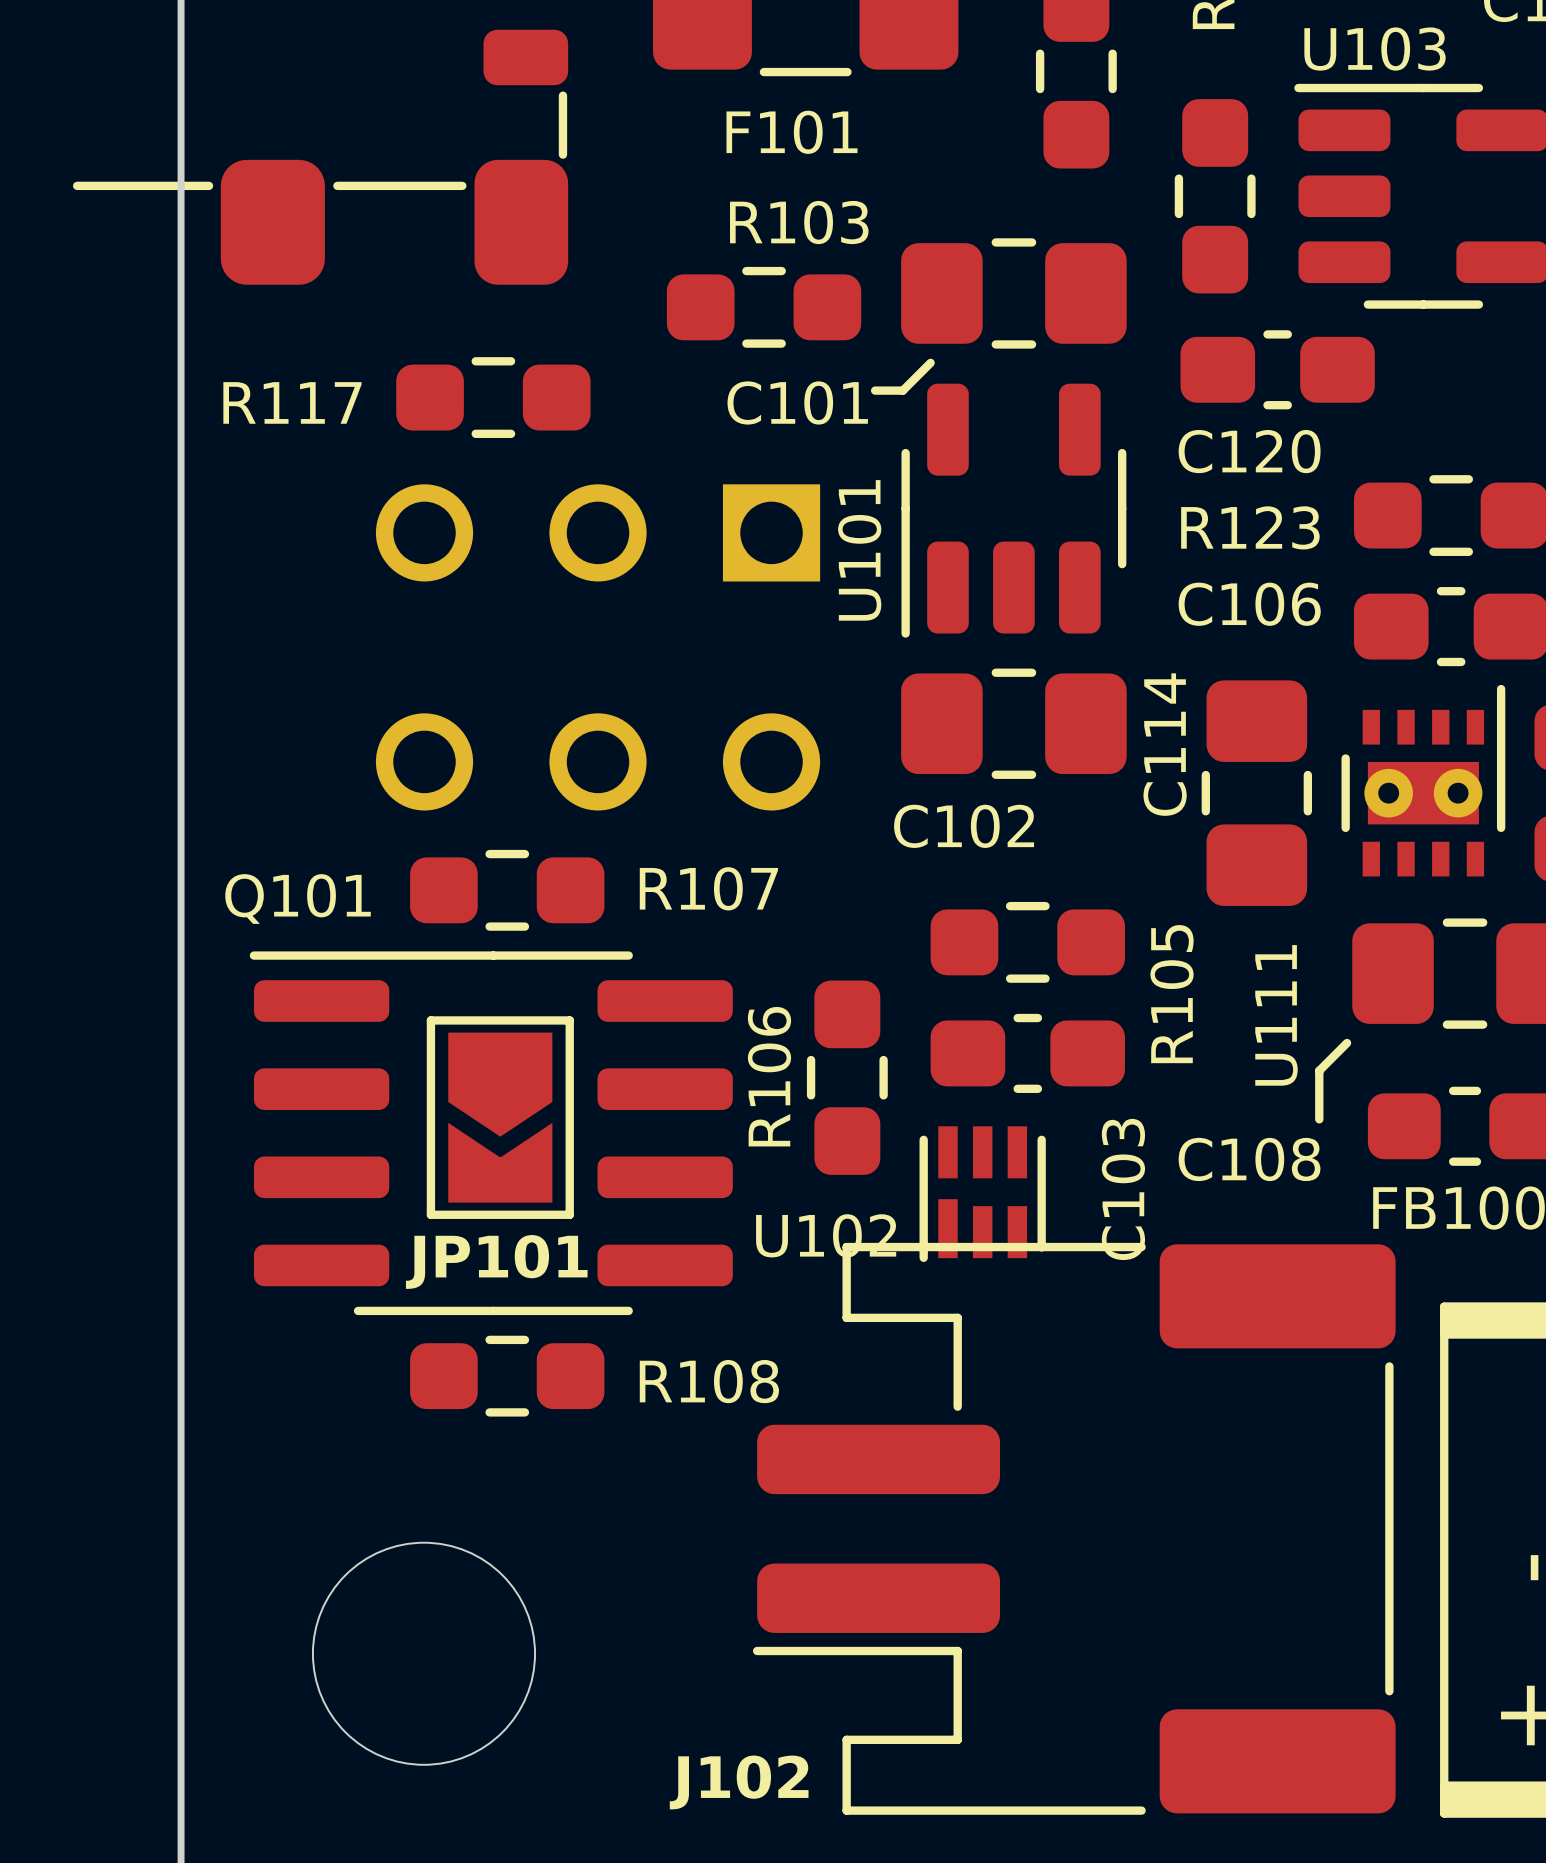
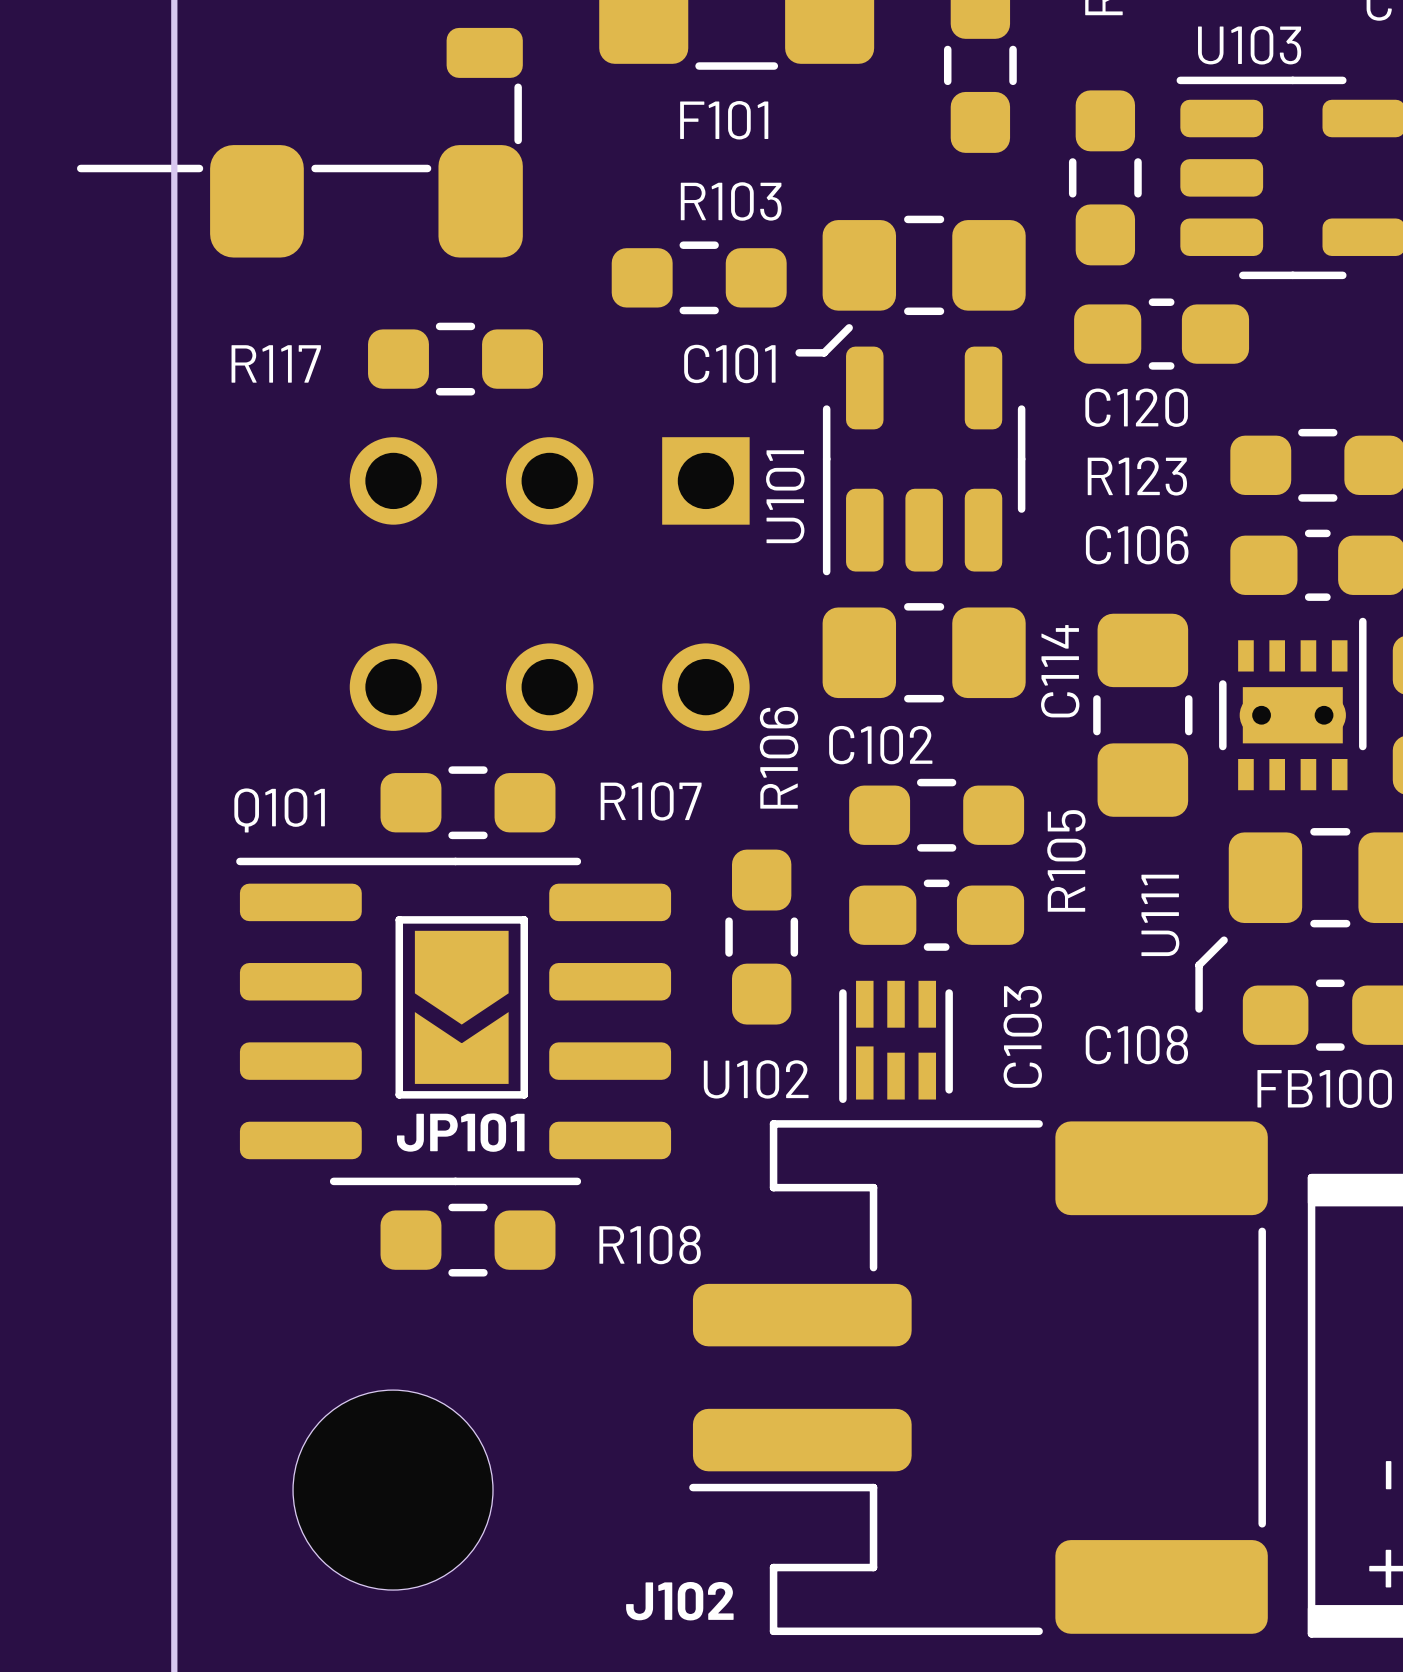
R105 position: (1027, 942) -> (936, 815)
C103 position: (1027, 1053) -> (936, 915)
R106 name position: R106 (769, 1076) -> R106 (779, 757)
R106 position: (847, 1077) -> (761, 937)
U102 position: (982, 1194) -> (896, 1041)

